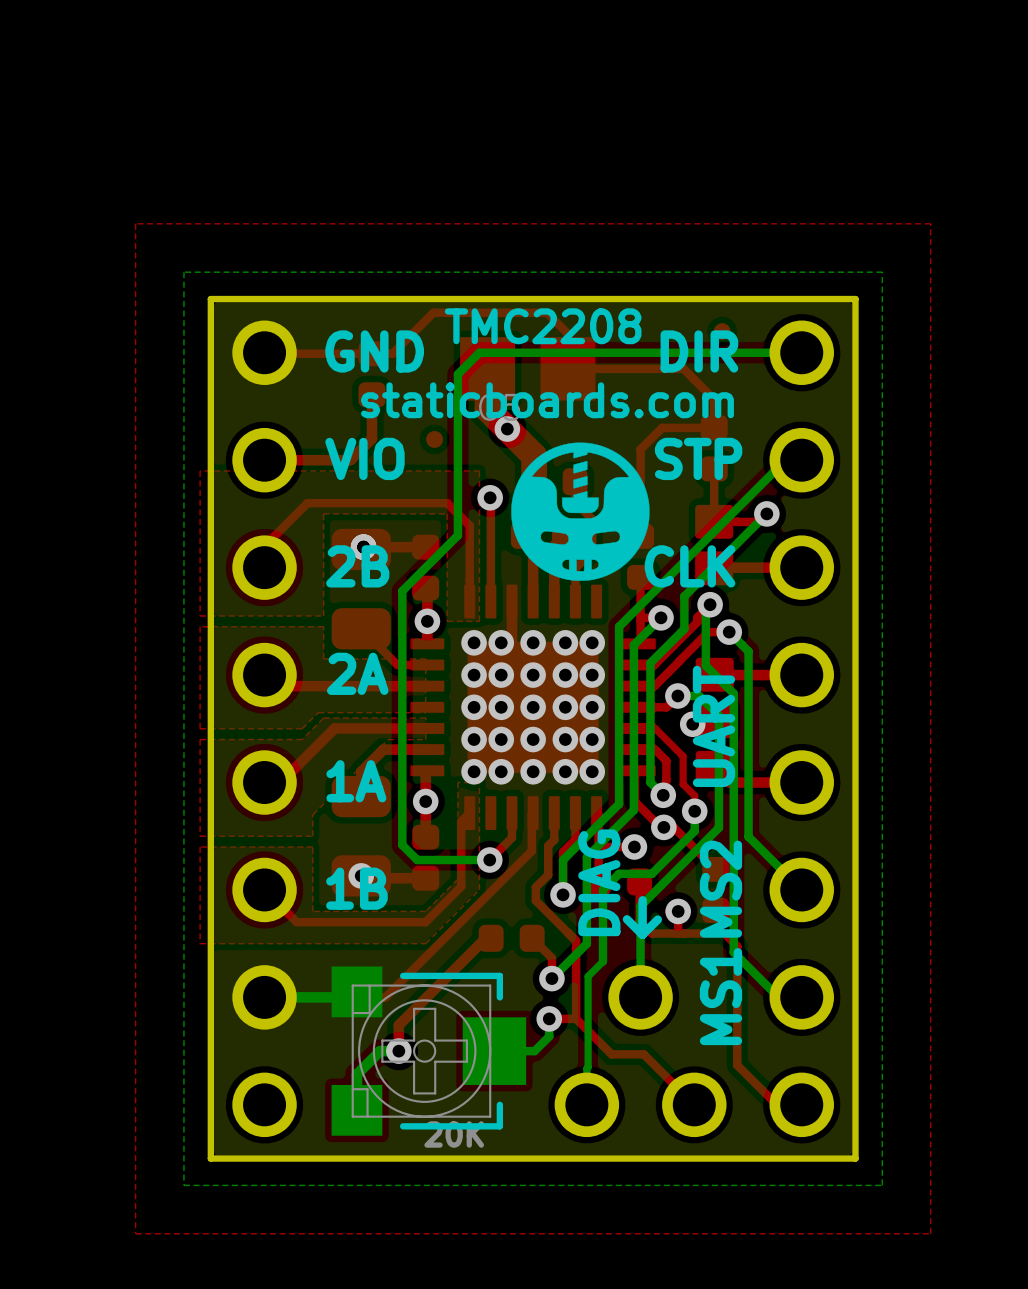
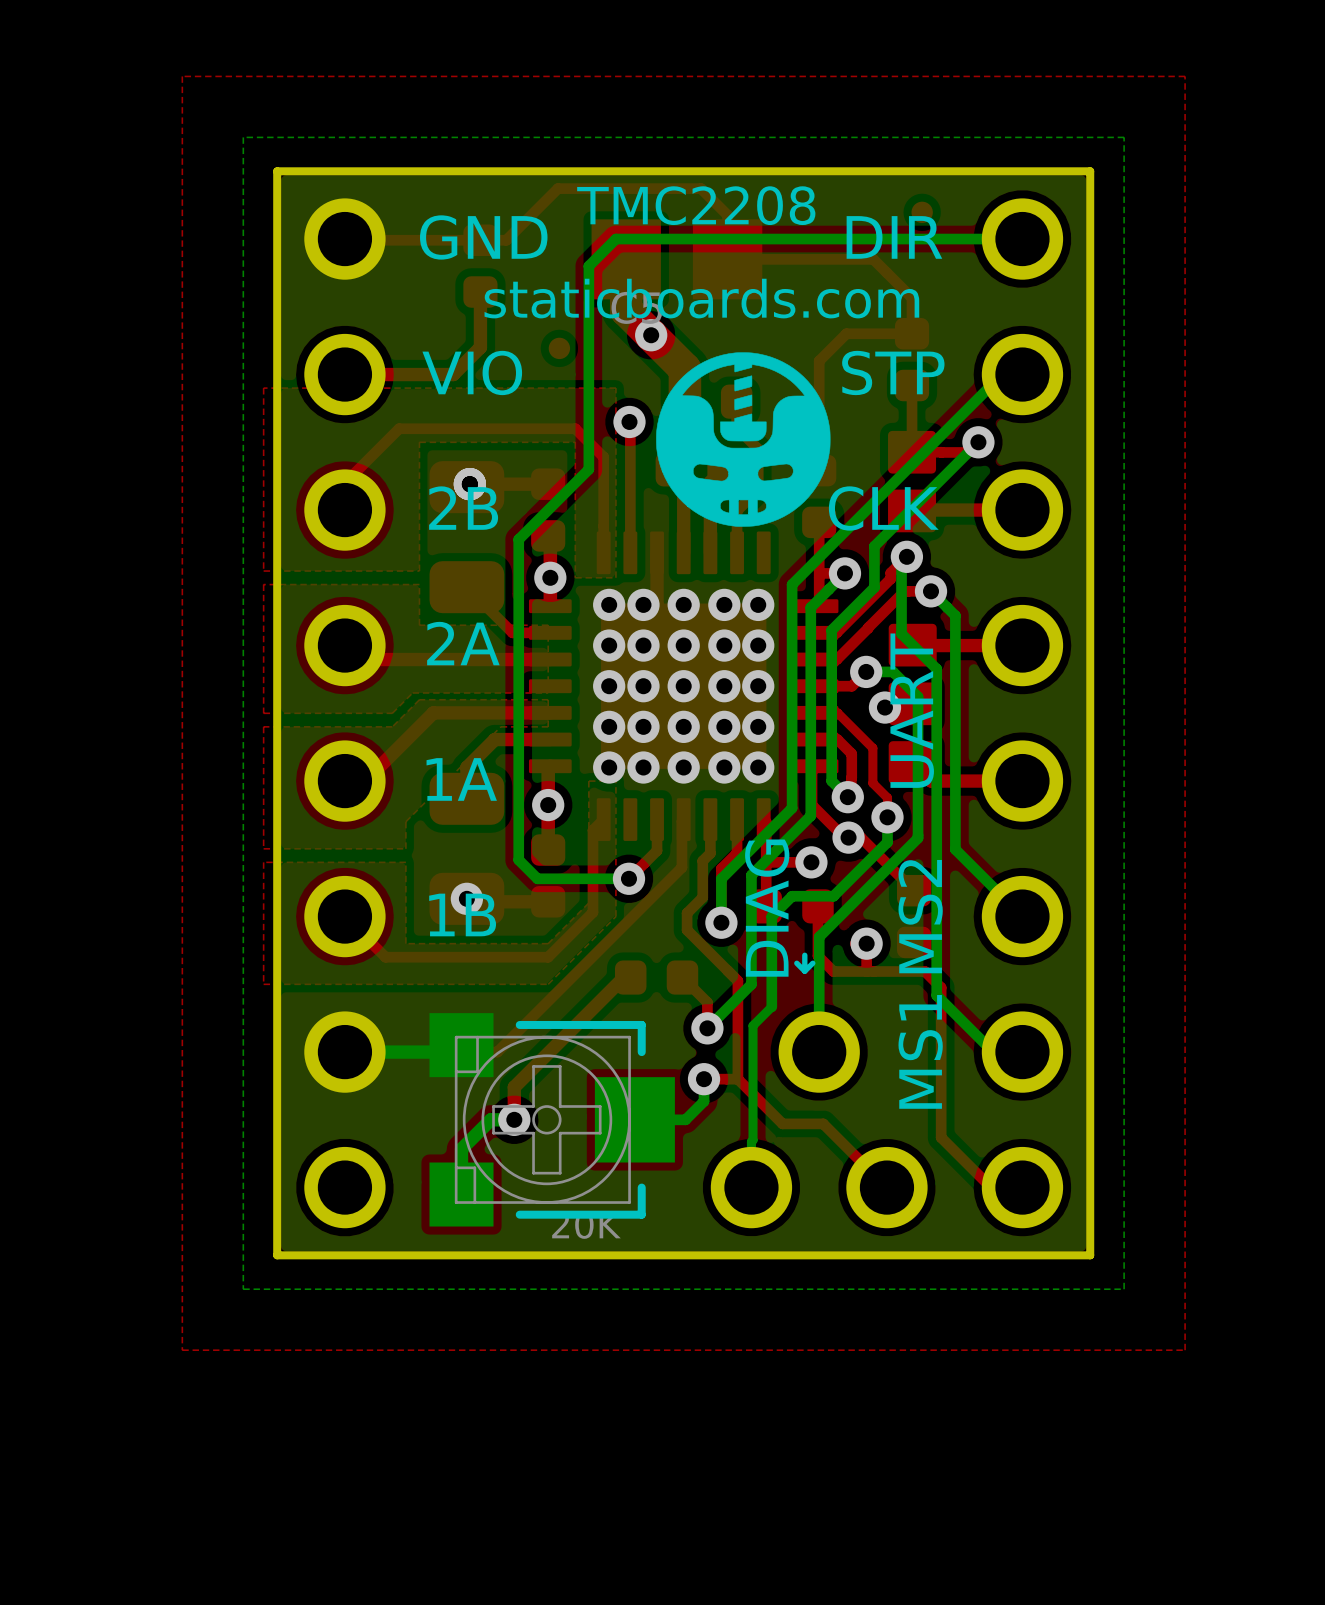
line: (642, 900) (642, 934) (657, 919) -> none
line: (626, 919) (642, 934) -> none
line: none -> (804, 955) (804, 968)
line: none -> (812, 963) (804, 971) (796, 963)

